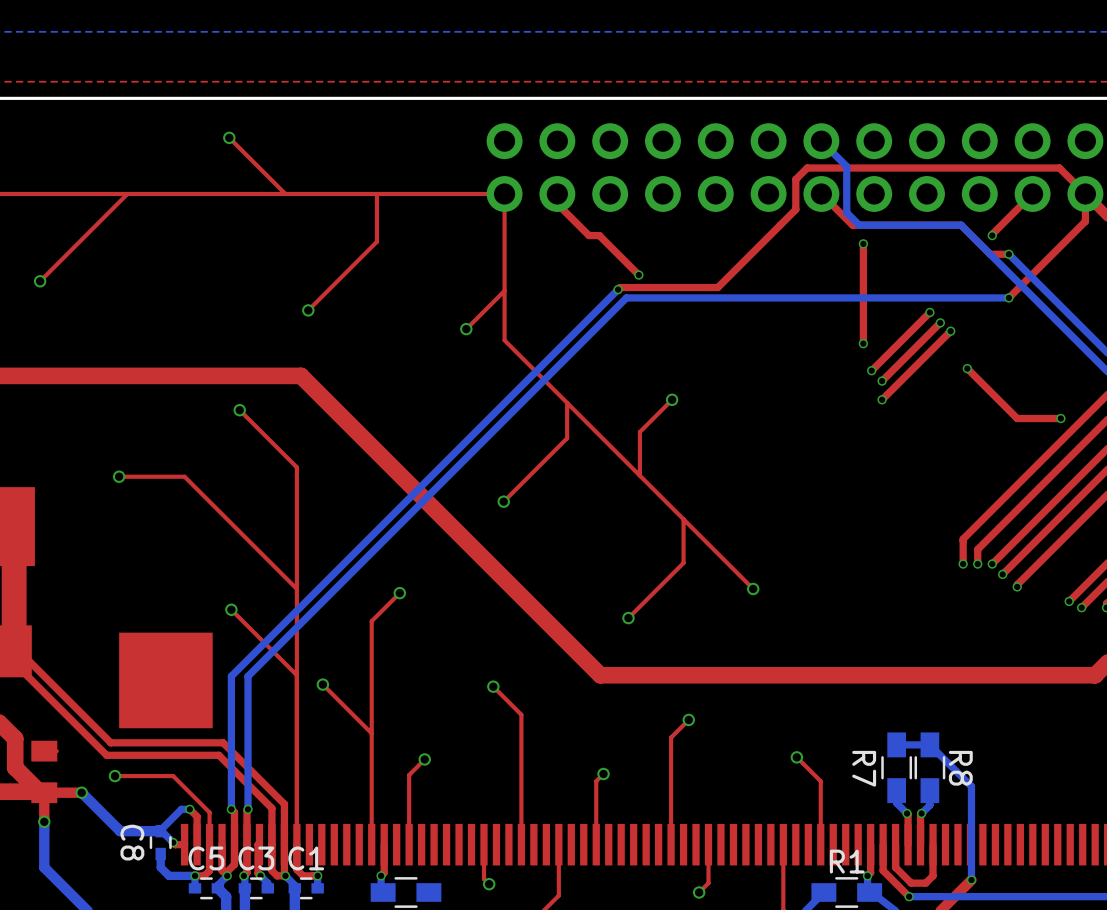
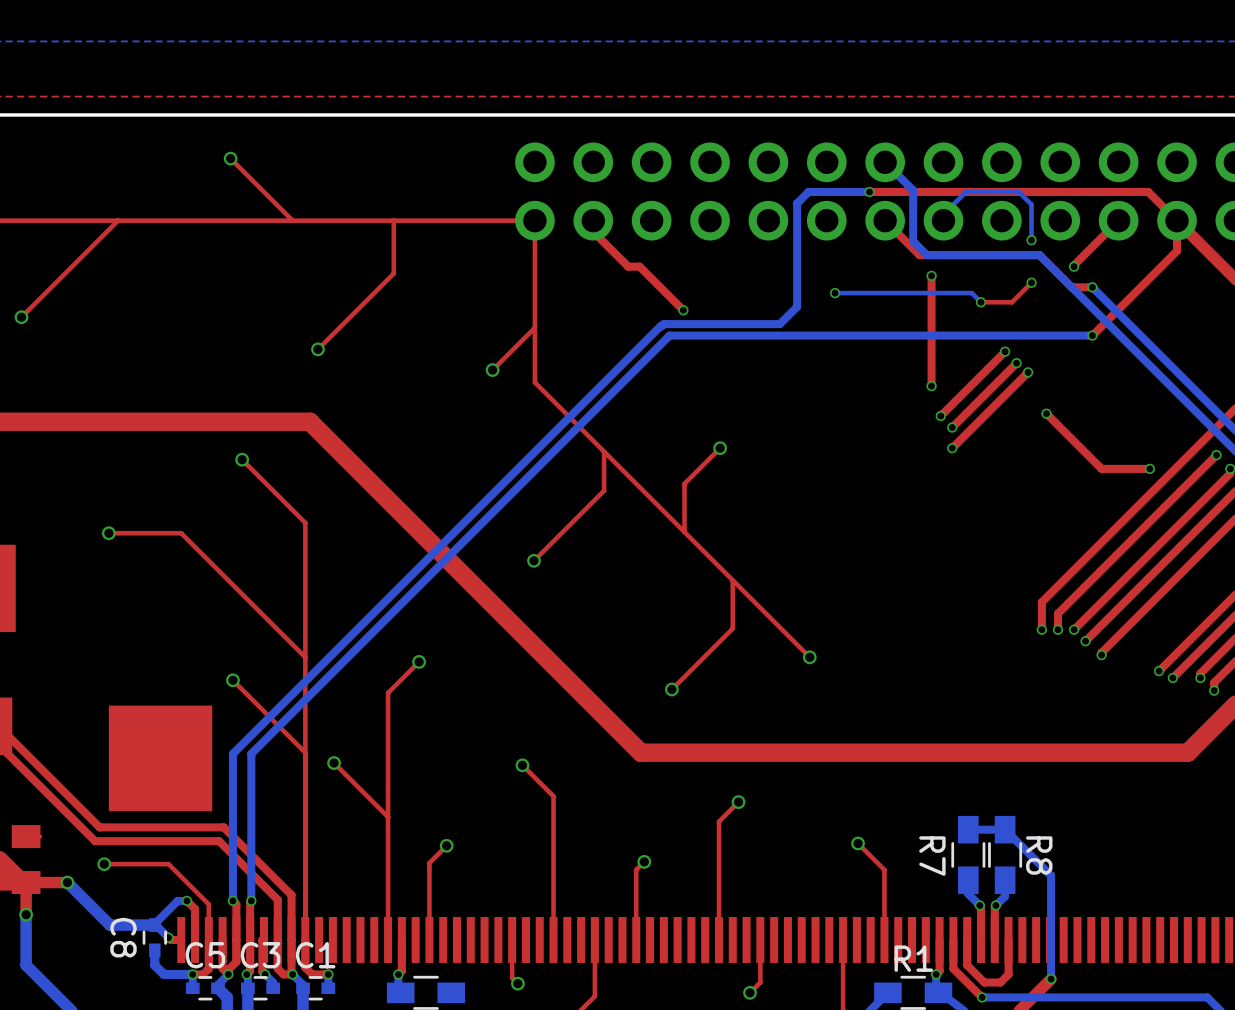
bottom track: none -> (869, 191) (808, 191) (797, 203) (797, 306) (779, 324) (663, 324) (660, 326)
top track: (807, 168) (795, 179) (795, 209) (717, 287) (620, 287) (618, 289) -> none
via: none -> (869, 191)
bottom track: none -> (943, 220) (943, 214) (966, 191) (1018, 191) (1031, 204) (1031, 240)
via: none -> (1031, 240)
top track: none -> (1031, 282) (1012, 302) (980, 302)
via: none -> (1031, 282)
bottom track: none -> (835, 293) (971, 293) (980, 302)
via: none -> (835, 293)
via: none -> (980, 302)
via: (618, 289) -> none

